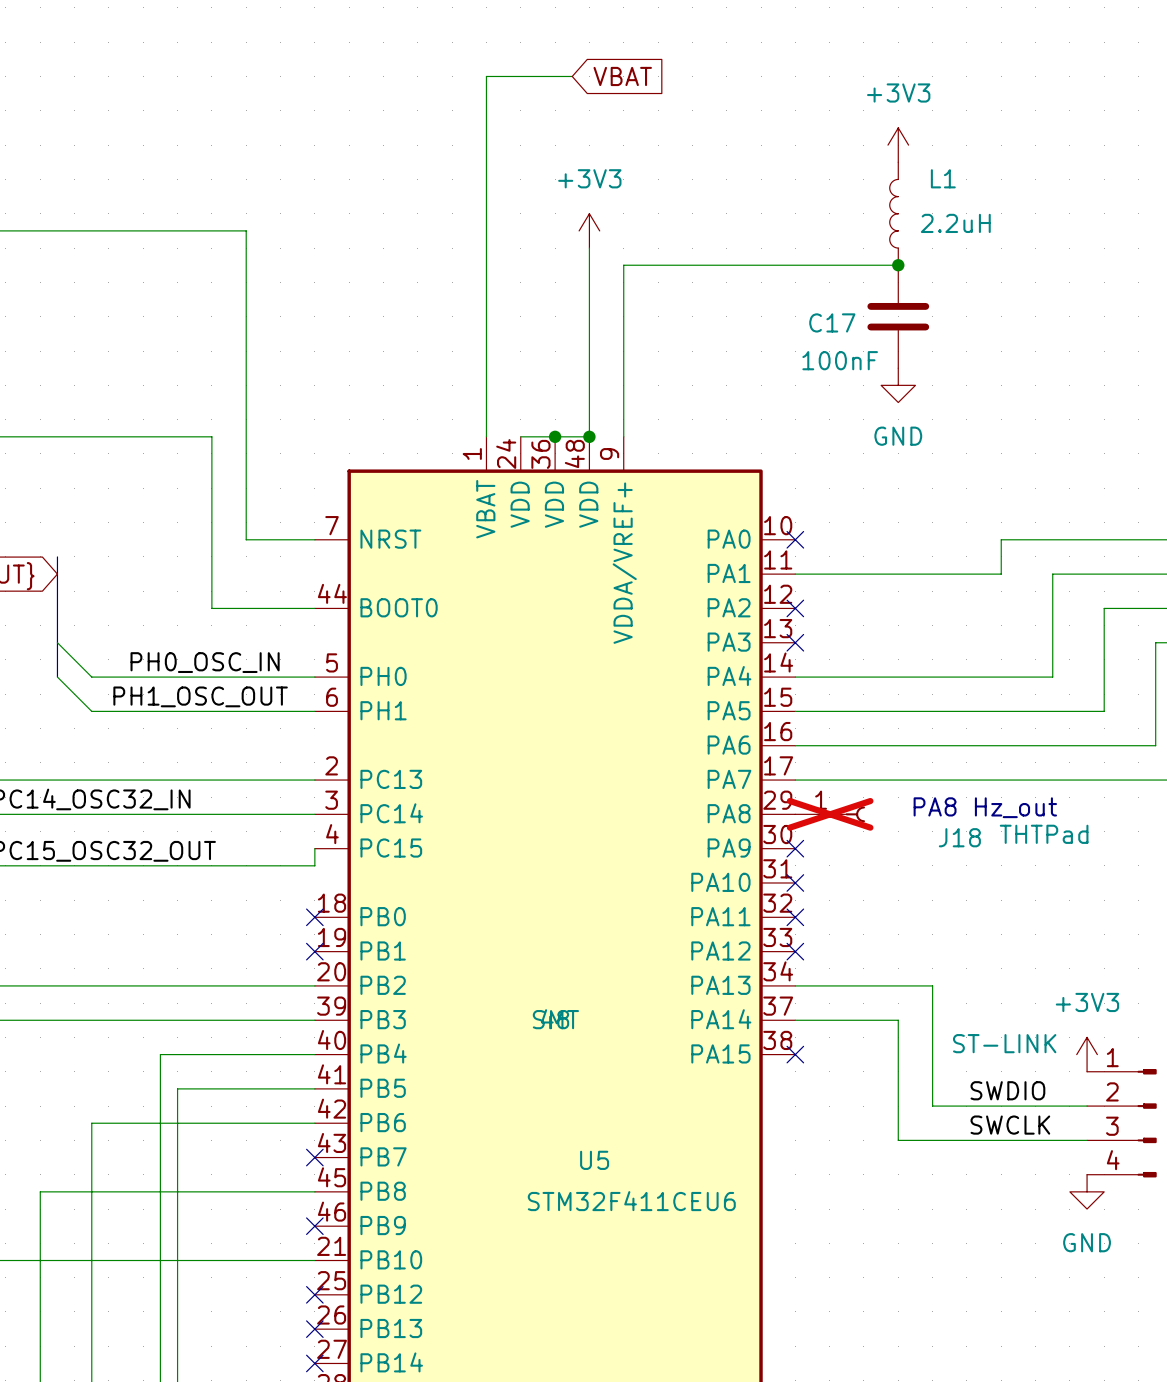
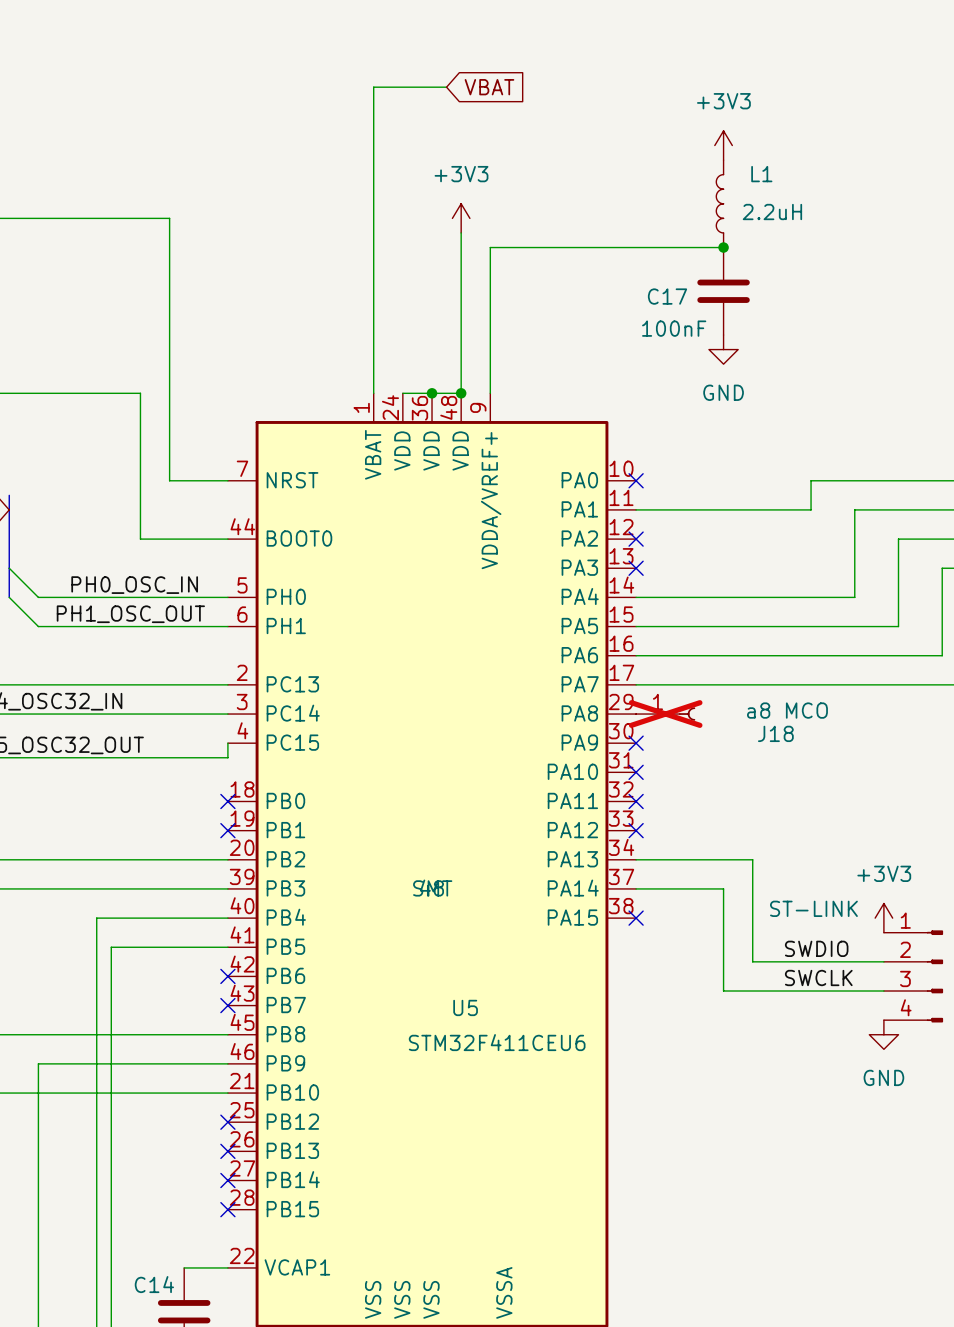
text: PA8 Hz_out (985, 807) -> none
J18 value: THTPad (1044, 834) -> a8 MCO (787, 710)
wire: (314, 1123) (91, 1123) (91, 1226) -> (227, 1063) (38, 1063)
no-connect mark: none -> (227, 976)
no-connect mark: (314, 1226) -> none

